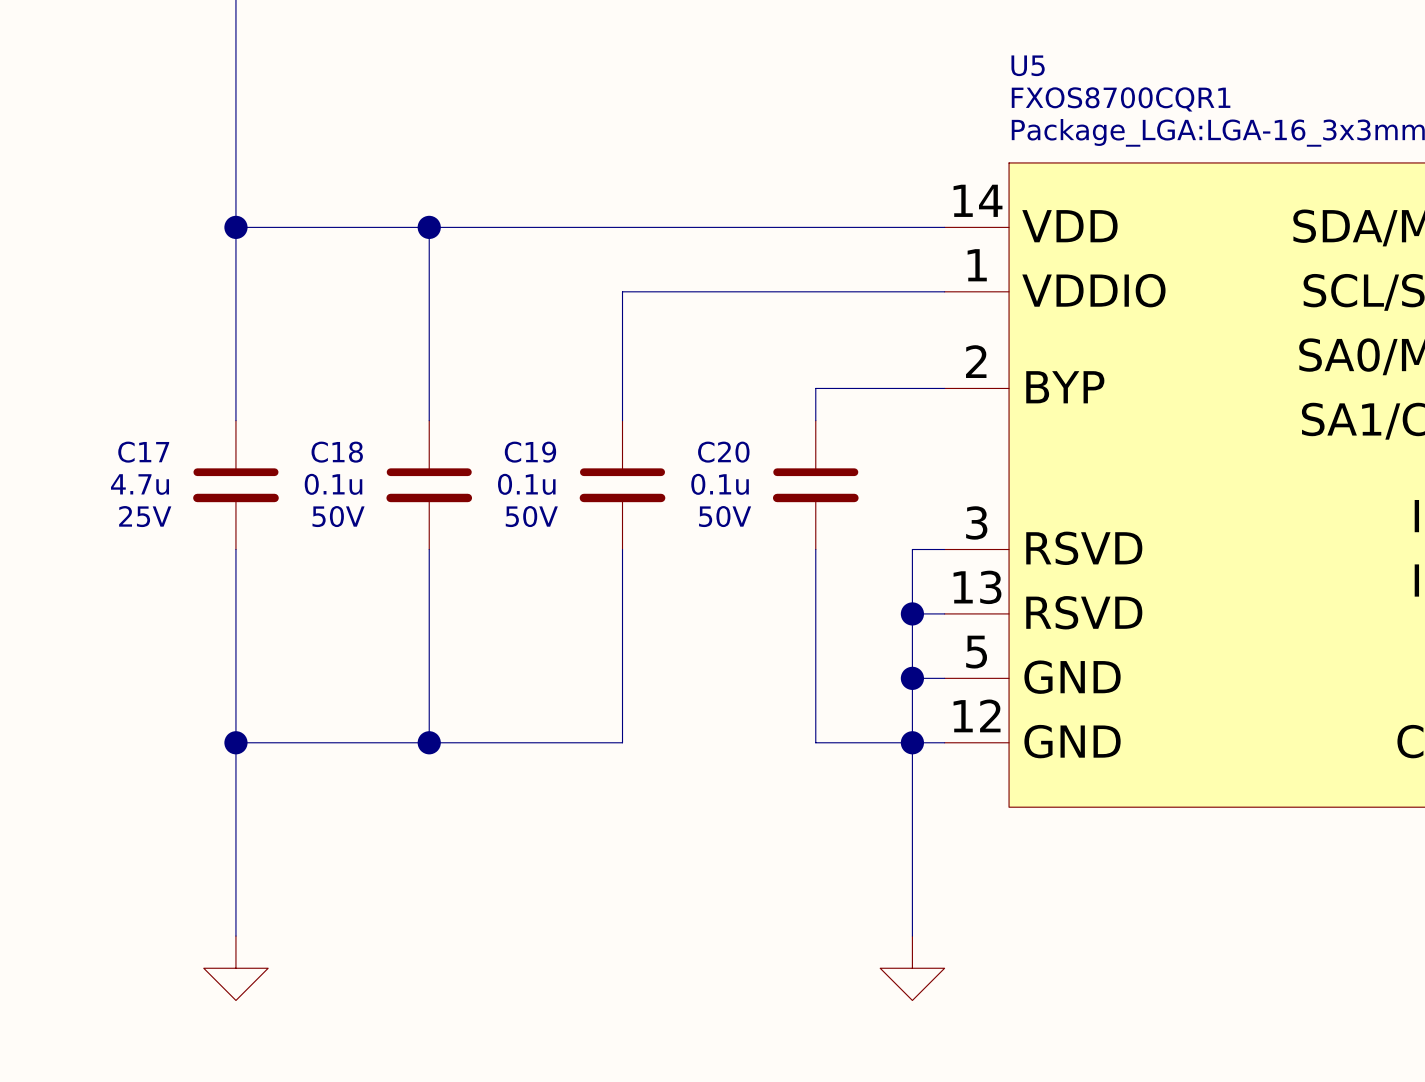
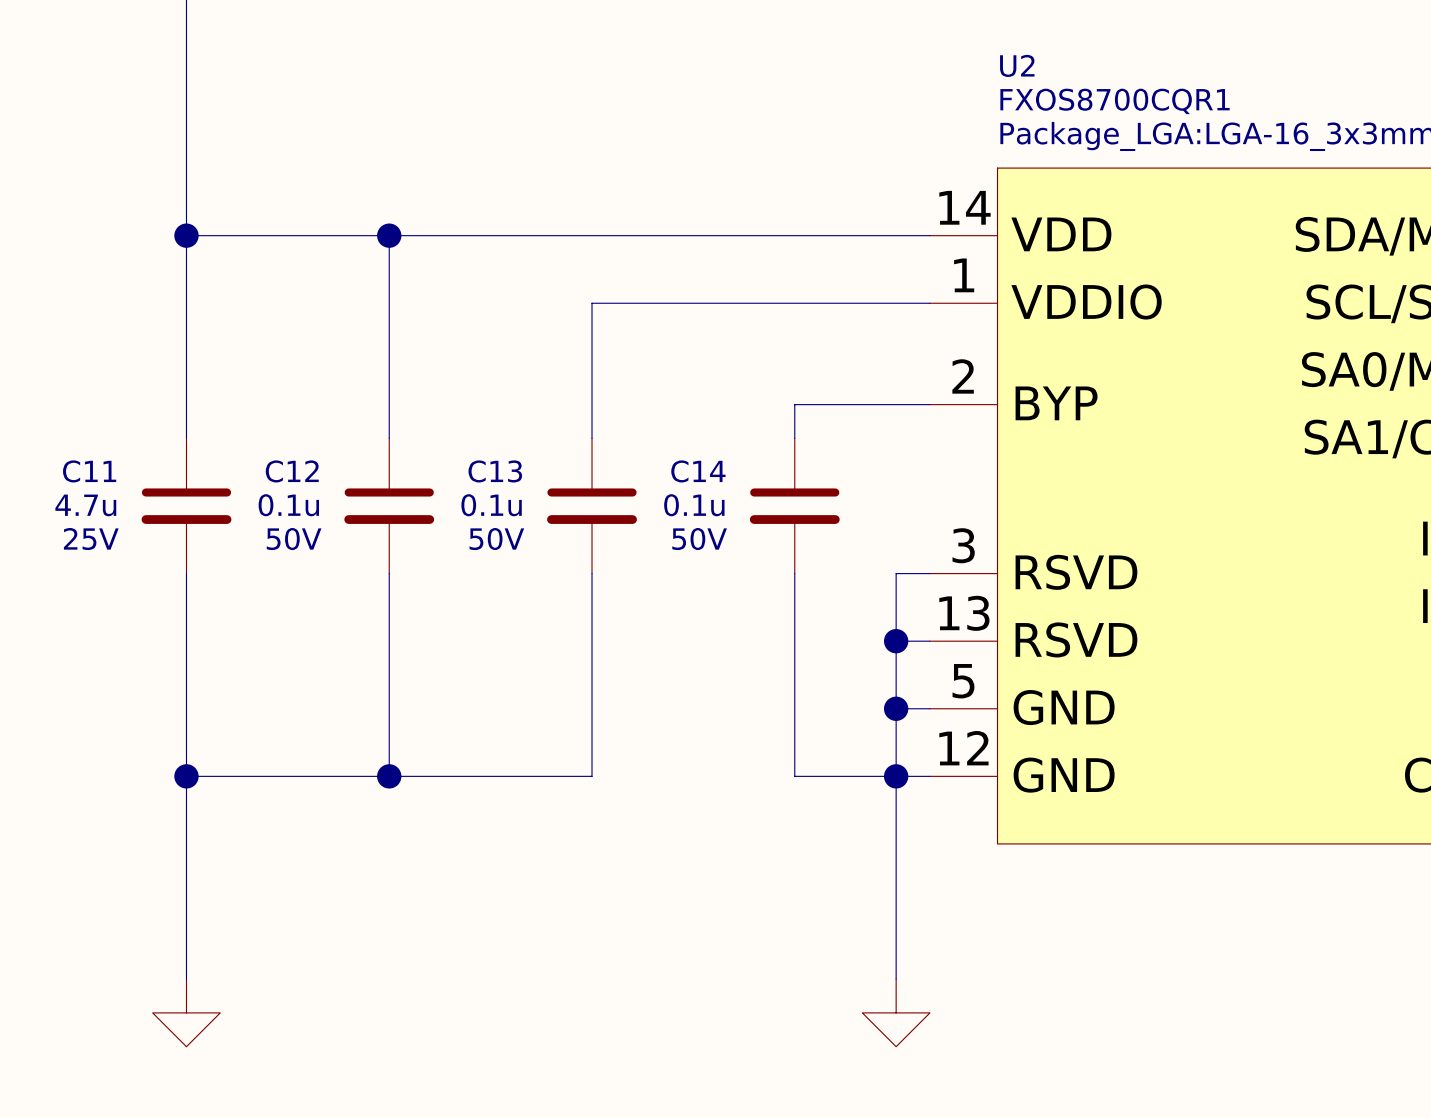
U5 name: U5 (1028, 65) -> U2 (1017, 65)
C17 name: C17 (143, 452) -> C11 (89, 471)
C18 name: C18 (337, 452) -> C12 (292, 471)
C19 name: C19 (530, 452) -> C13 (495, 471)
C20 name: C20 (723, 452) -> C14 (698, 471)

